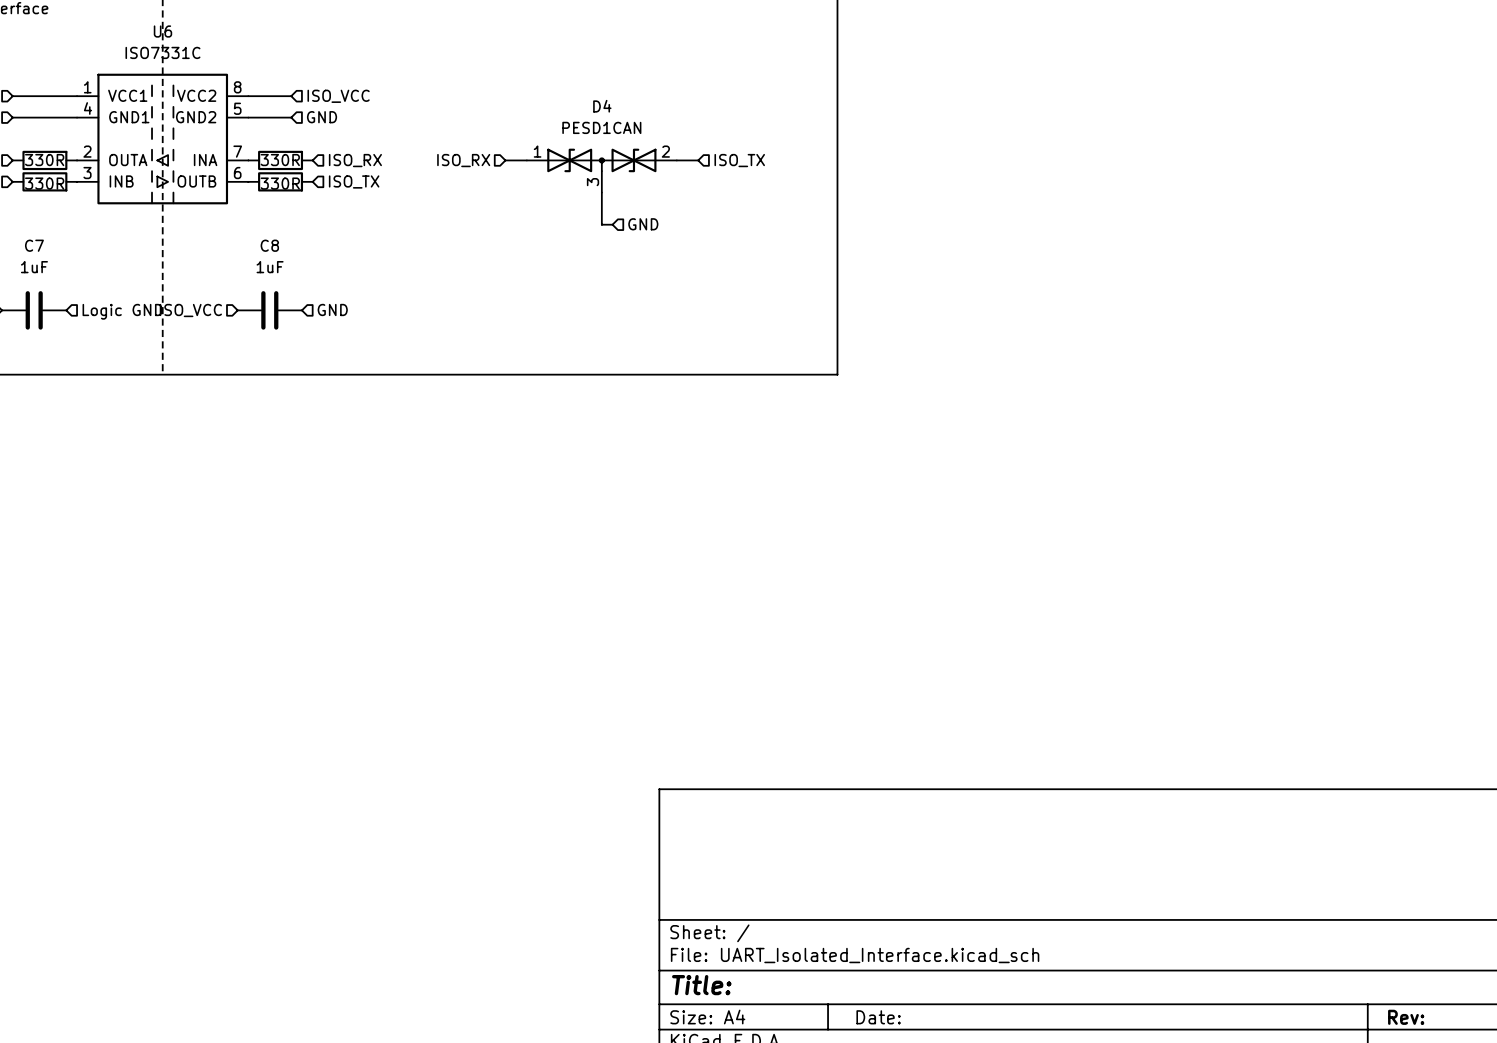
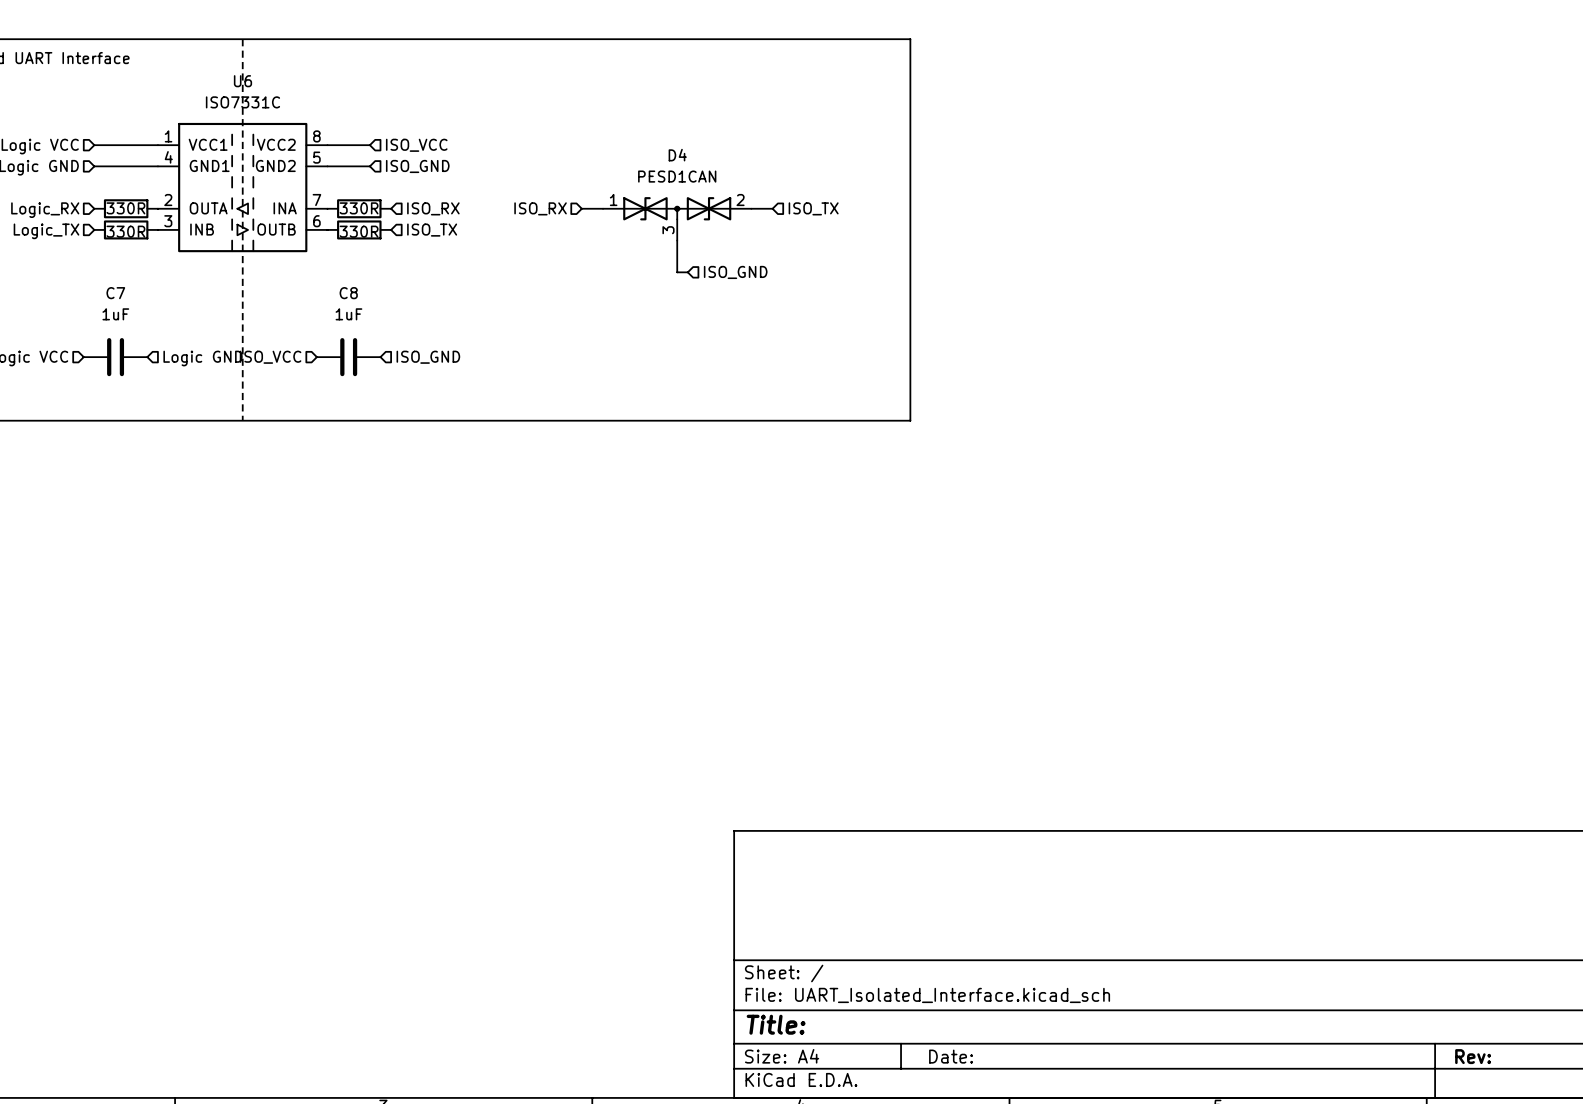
hierarchical label: GND (322, 117) -> ISO_GND (417, 166)
hierarchical label: GND (643, 224) -> ISO_GND (735, 272)
hierarchical label: GND (332, 309) -> ISO_GND (428, 357)

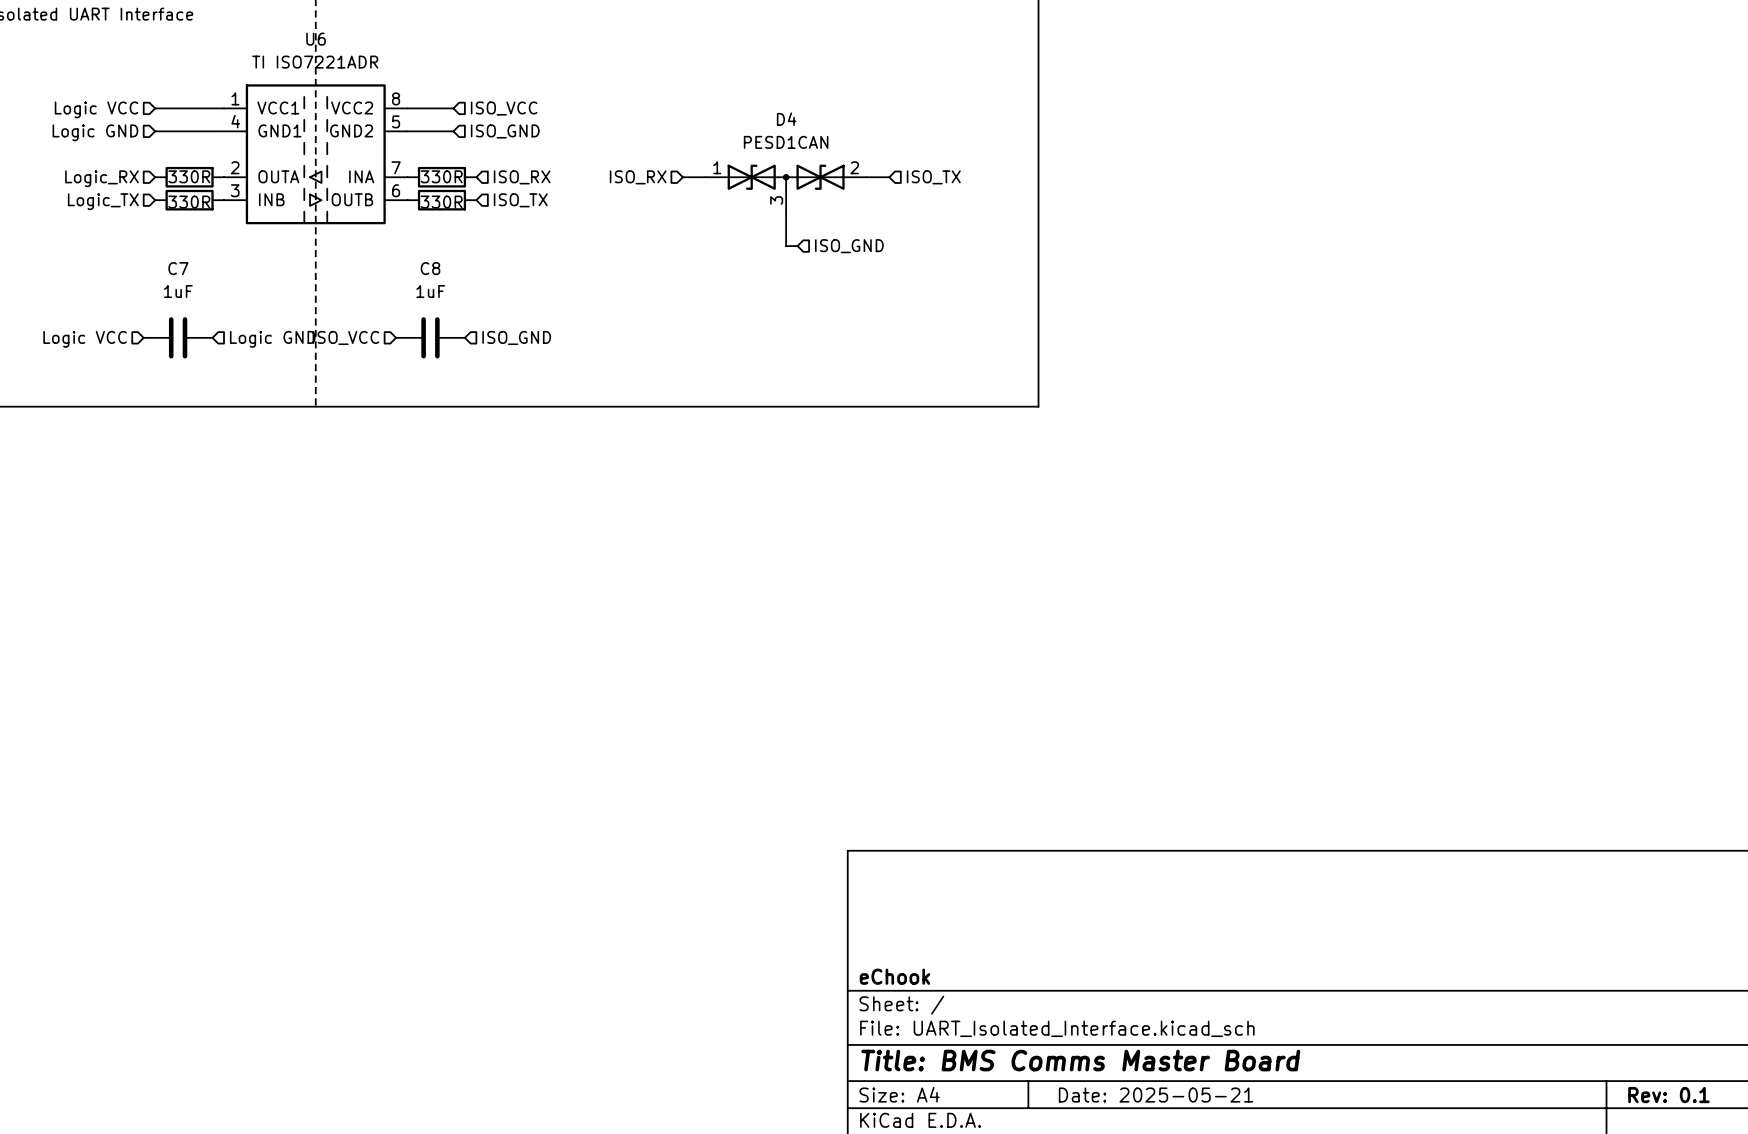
U6 value: ISO7331C (242, 102) -> TI ISO7221ADR (315, 62)
title block: none -> eChook (895, 976)
title block: Title: (776, 1024) -> Title: BMS Comms Master Board (1080, 1060)
title block: Date: (951, 1056) -> Date: 2025-05-21 (1156, 1095)
title block: Rev: (1473, 1056) -> Rev: 0.1 (1668, 1095)

